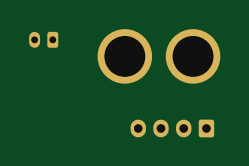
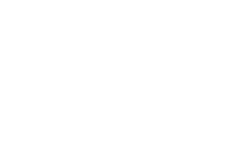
part: (43, 39) -> none
part: (158, 56) -> none
part: (172, 128) -> none

